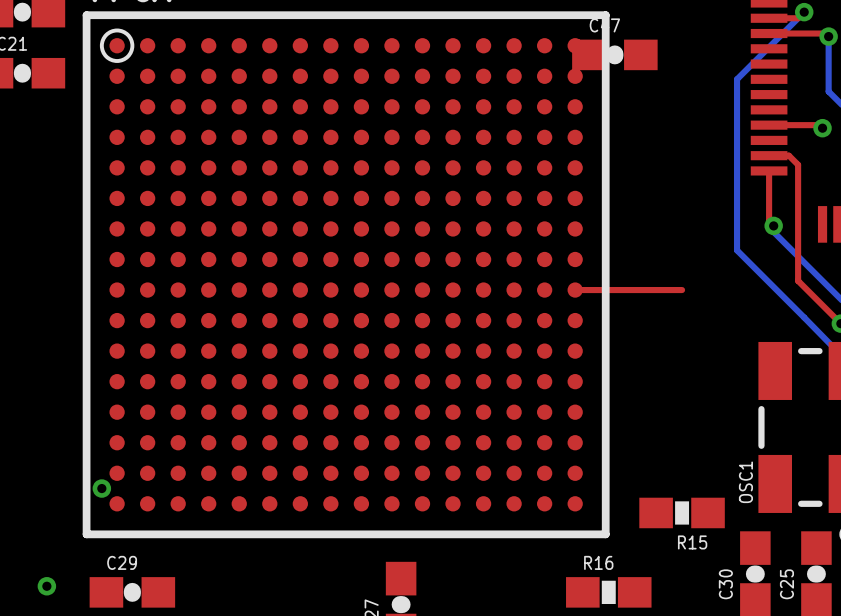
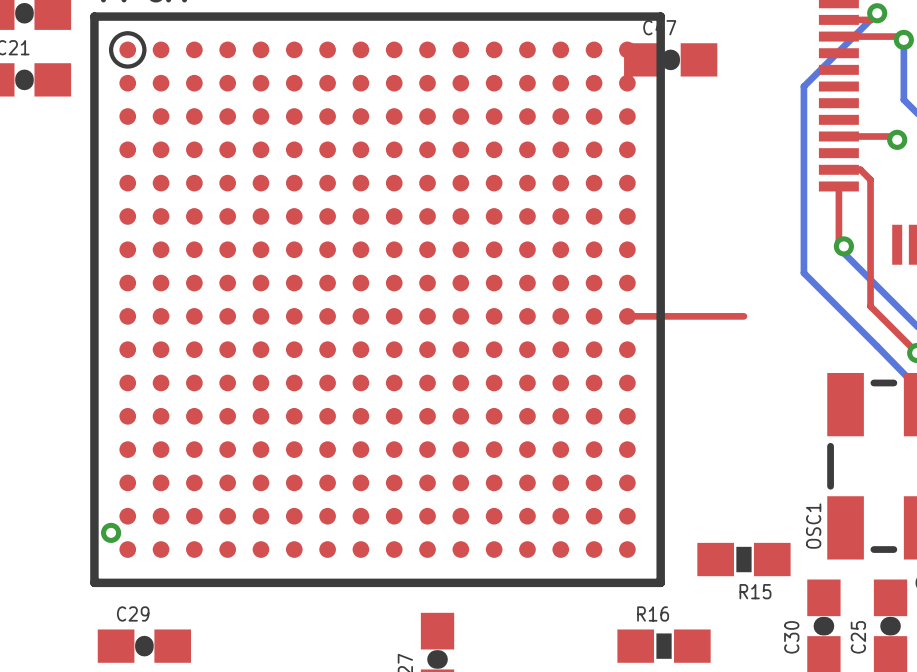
via: (46, 586) -> none

